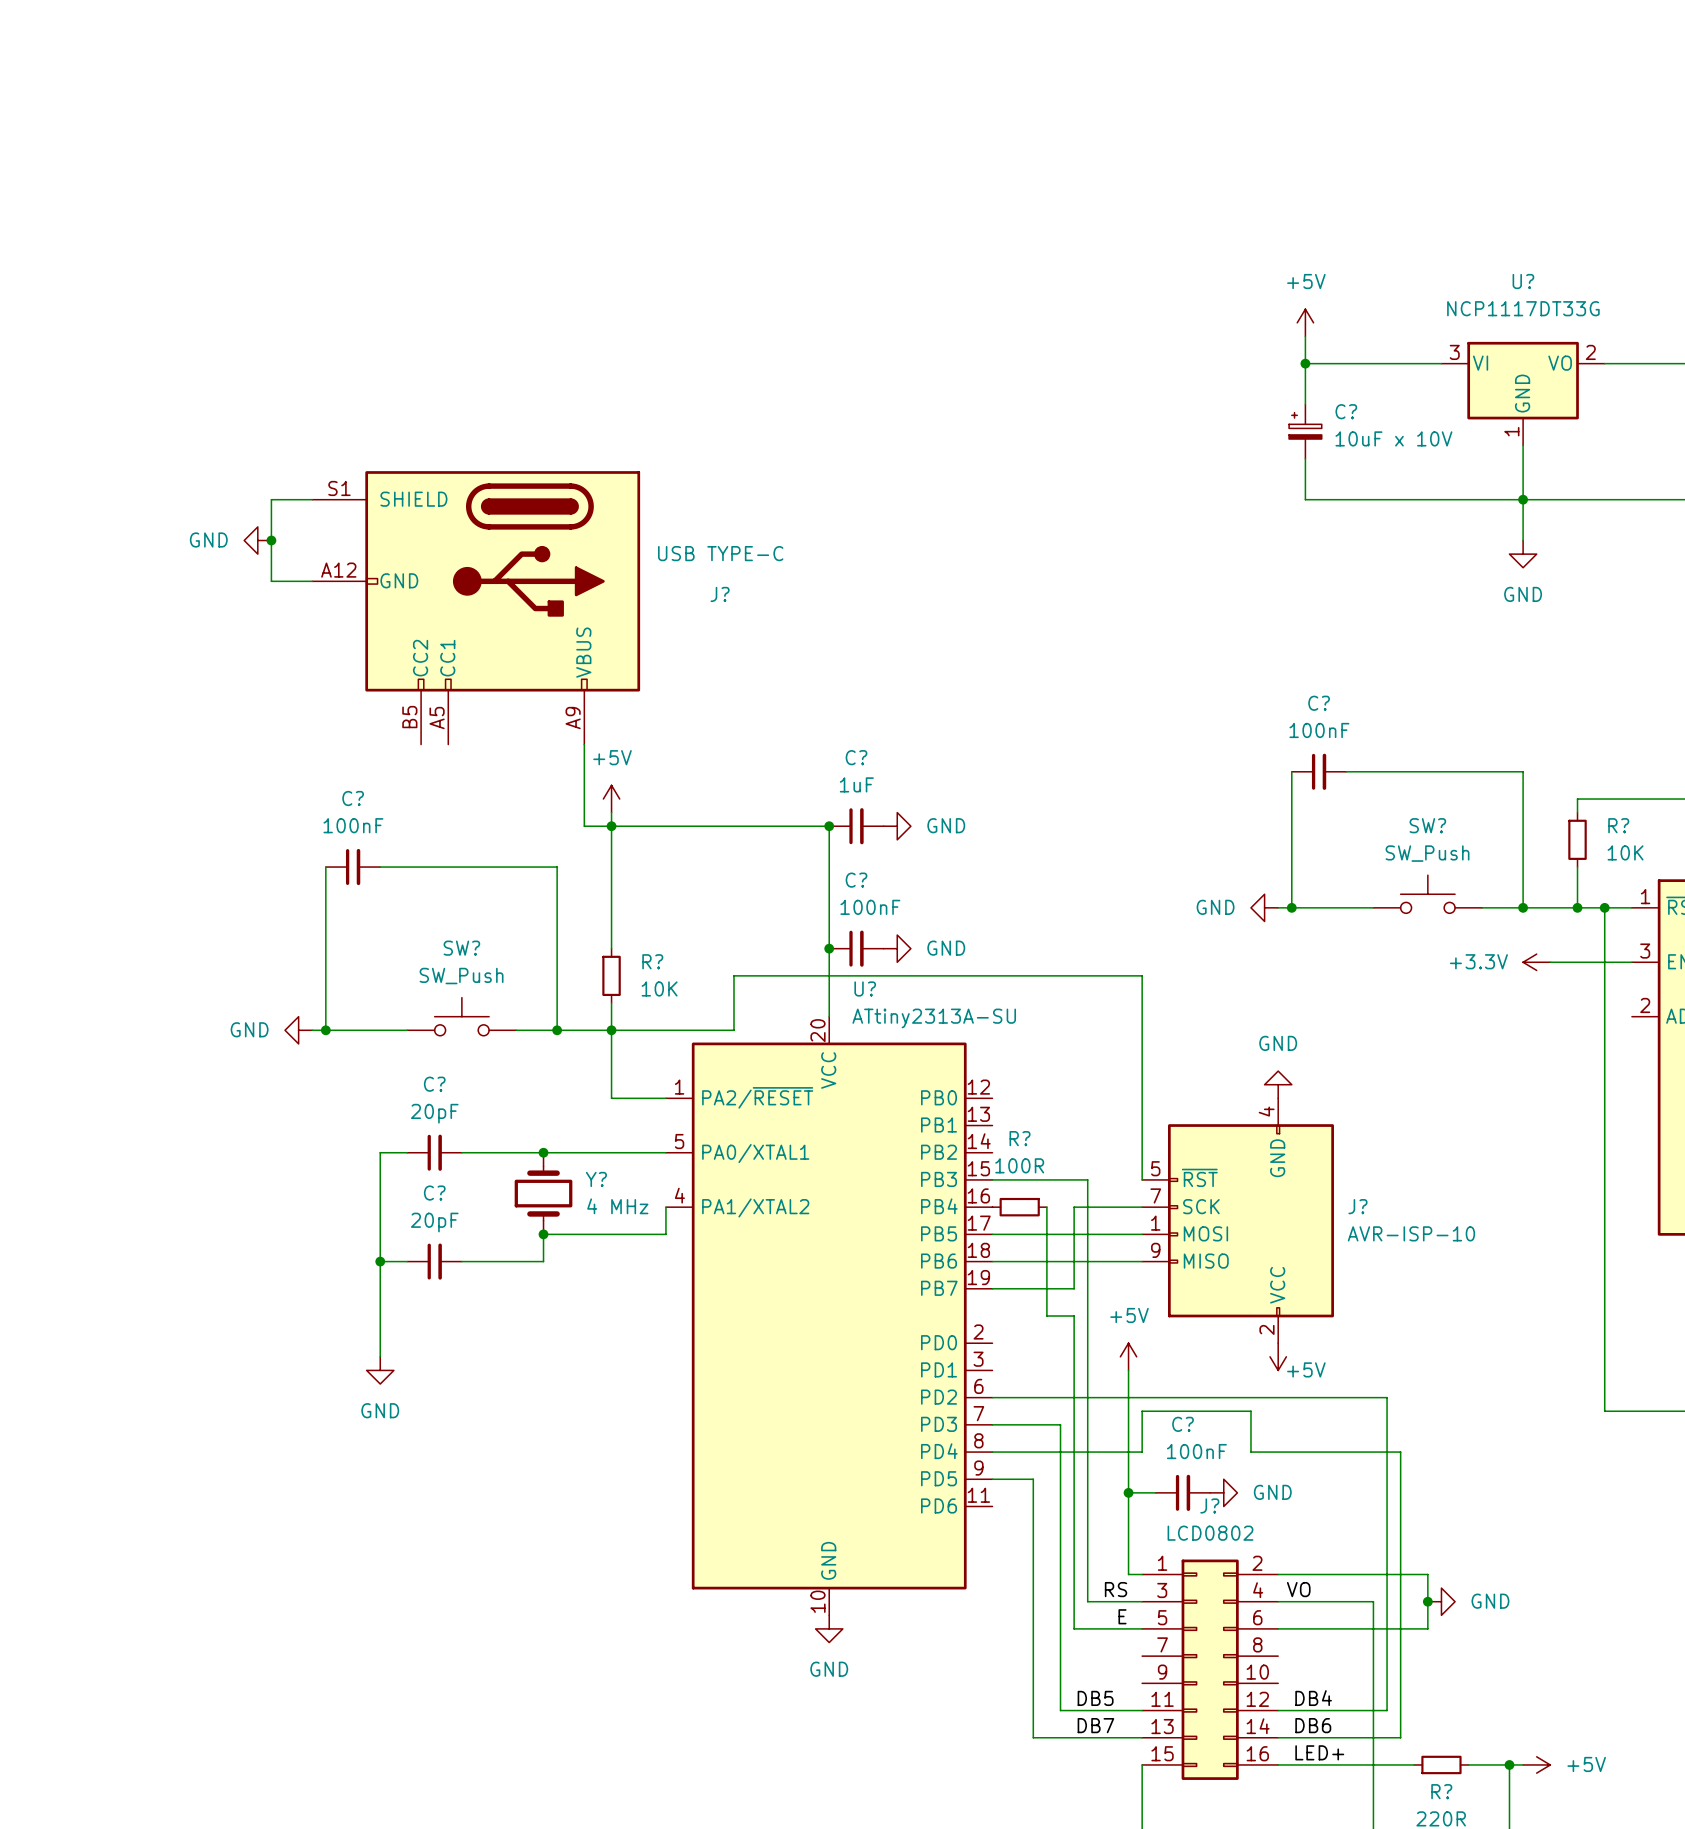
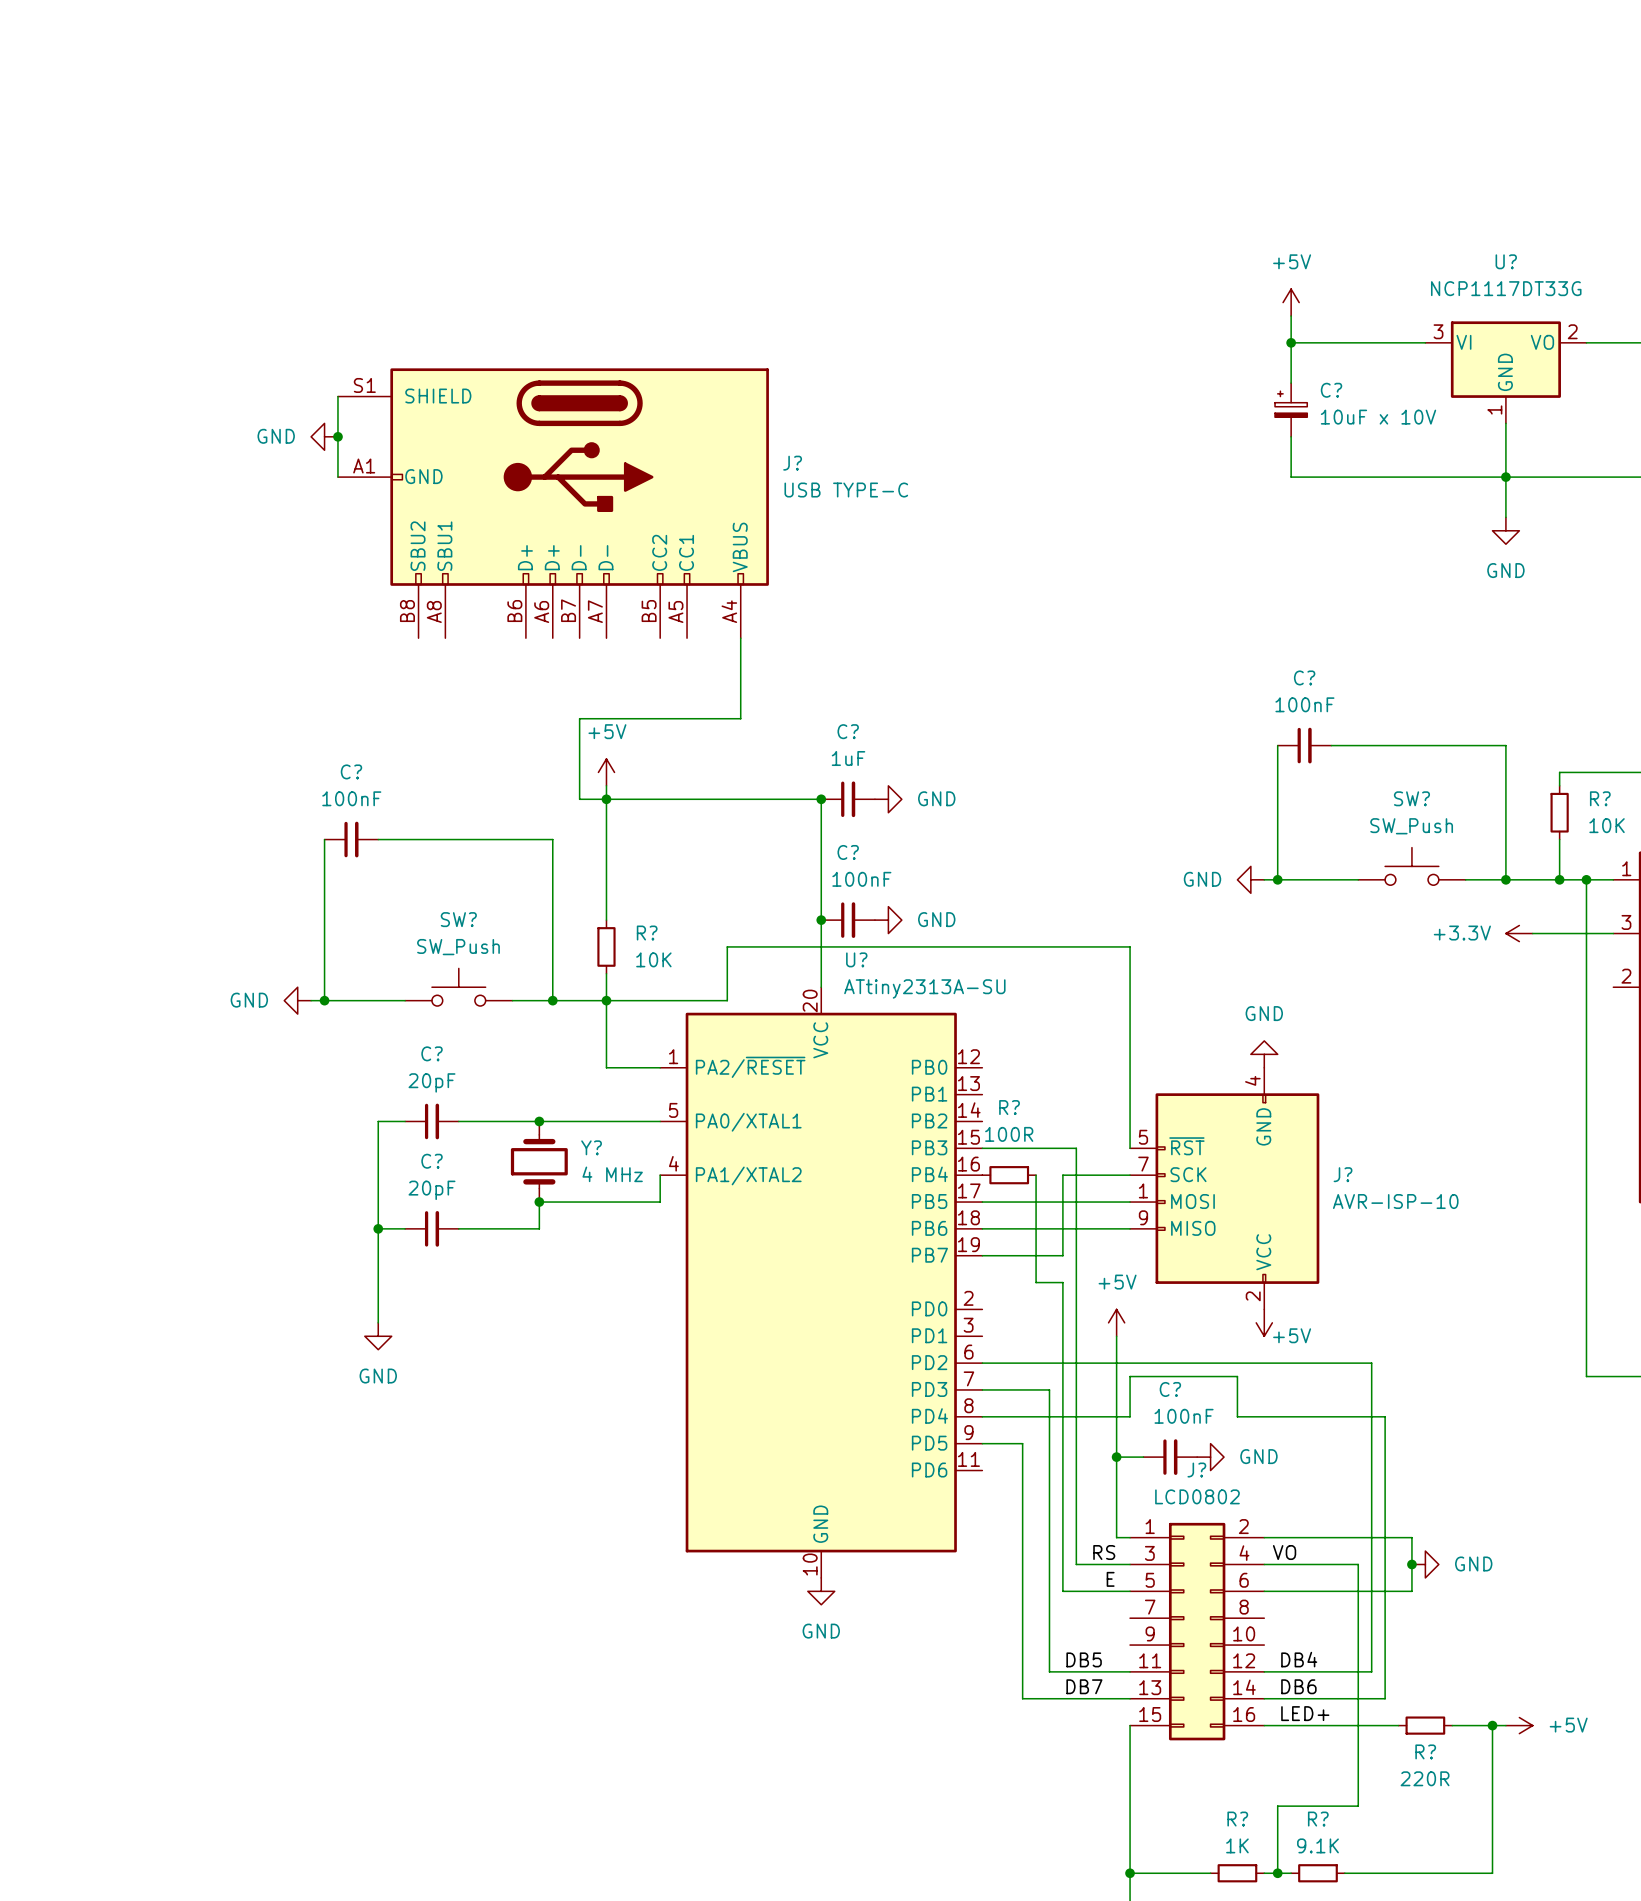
wire: none -> (337, 396) (337, 477)
junction: none -> (337, 436)
wire: (312, 499) (271, 499) (271, 581) (312, 581) -> none
J?: none -> USB TYPE-C (553, 503)
power symbol position: GND (257, 540) -> GND (324, 436)
junction: (271, 540) -> none
J?: USB TYPE-C (476, 607) -> none
wire: none -> (740, 638) (740, 718) (579, 718)

